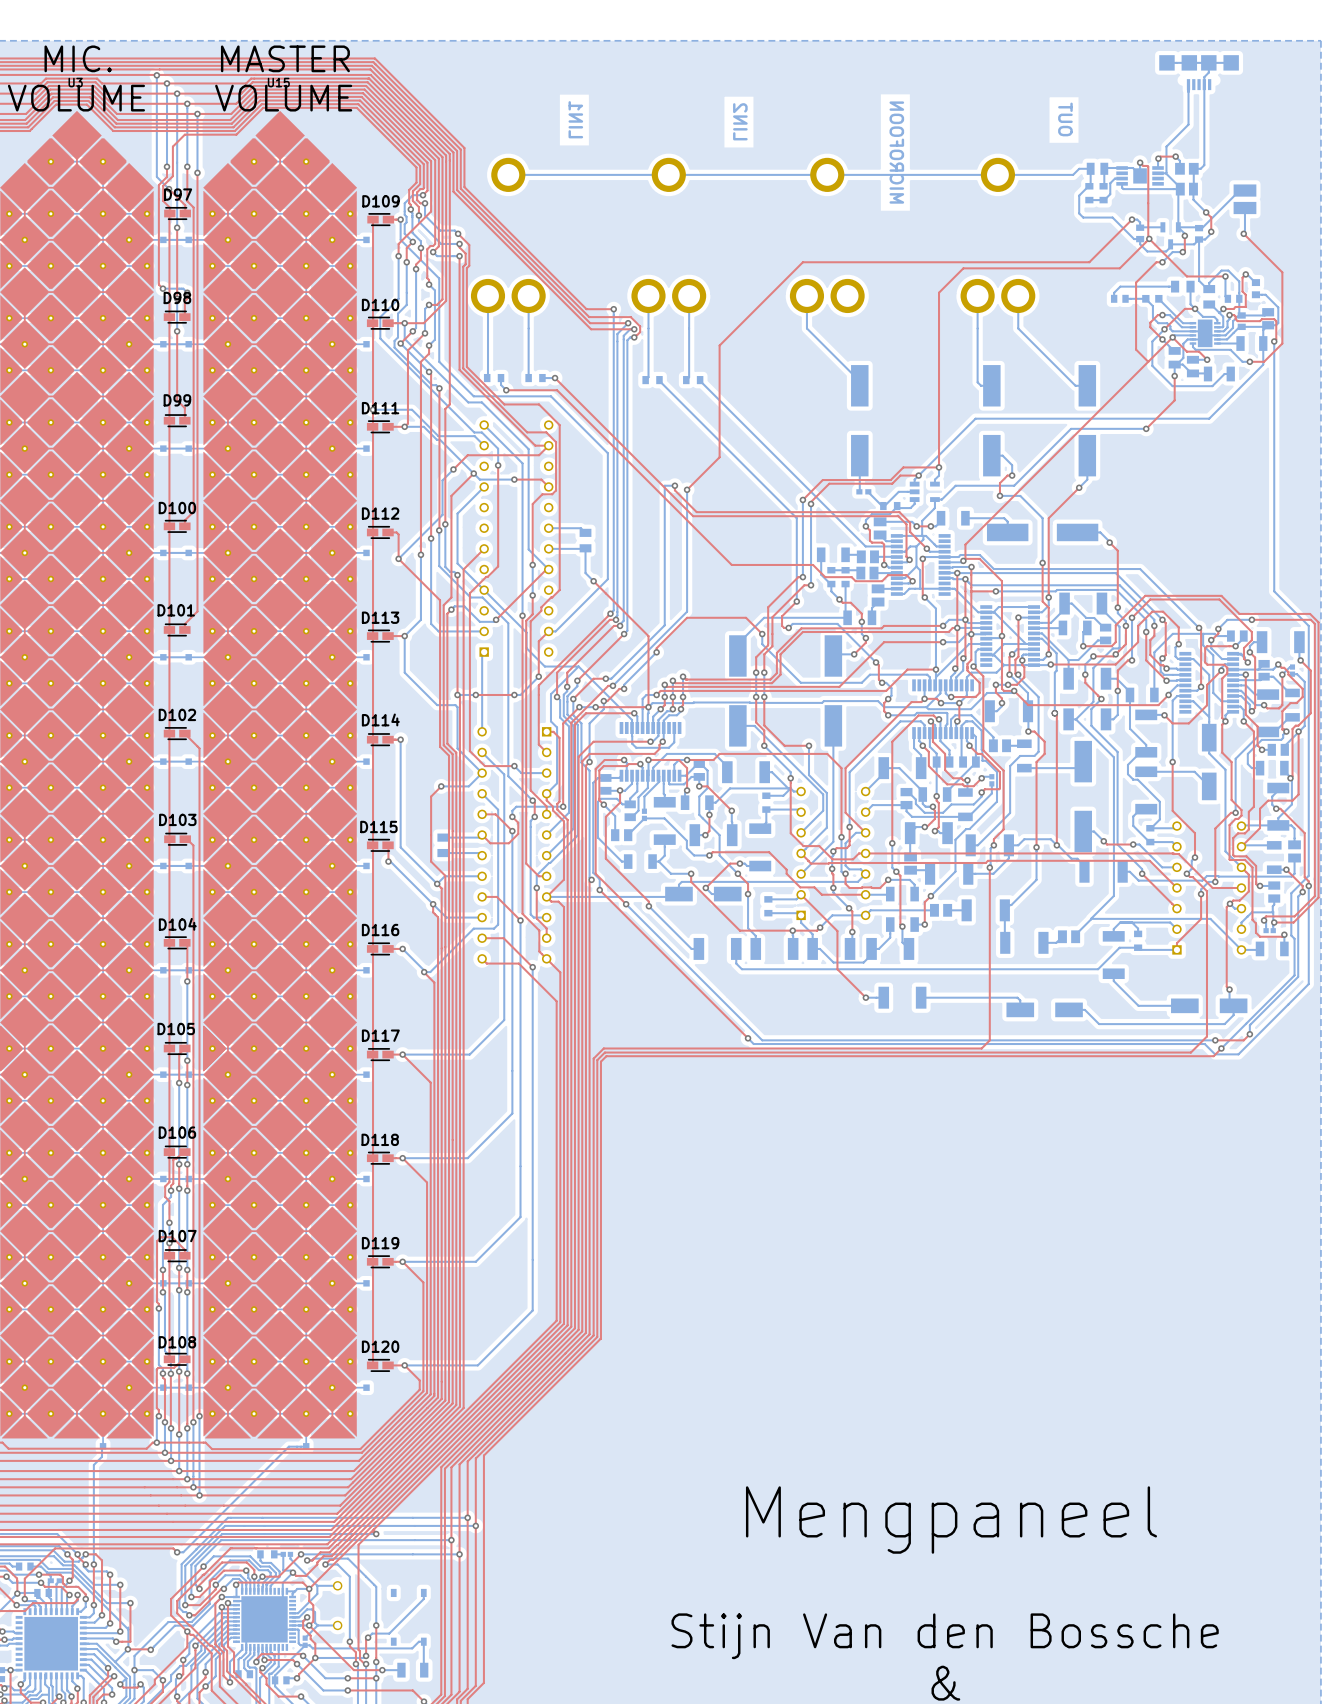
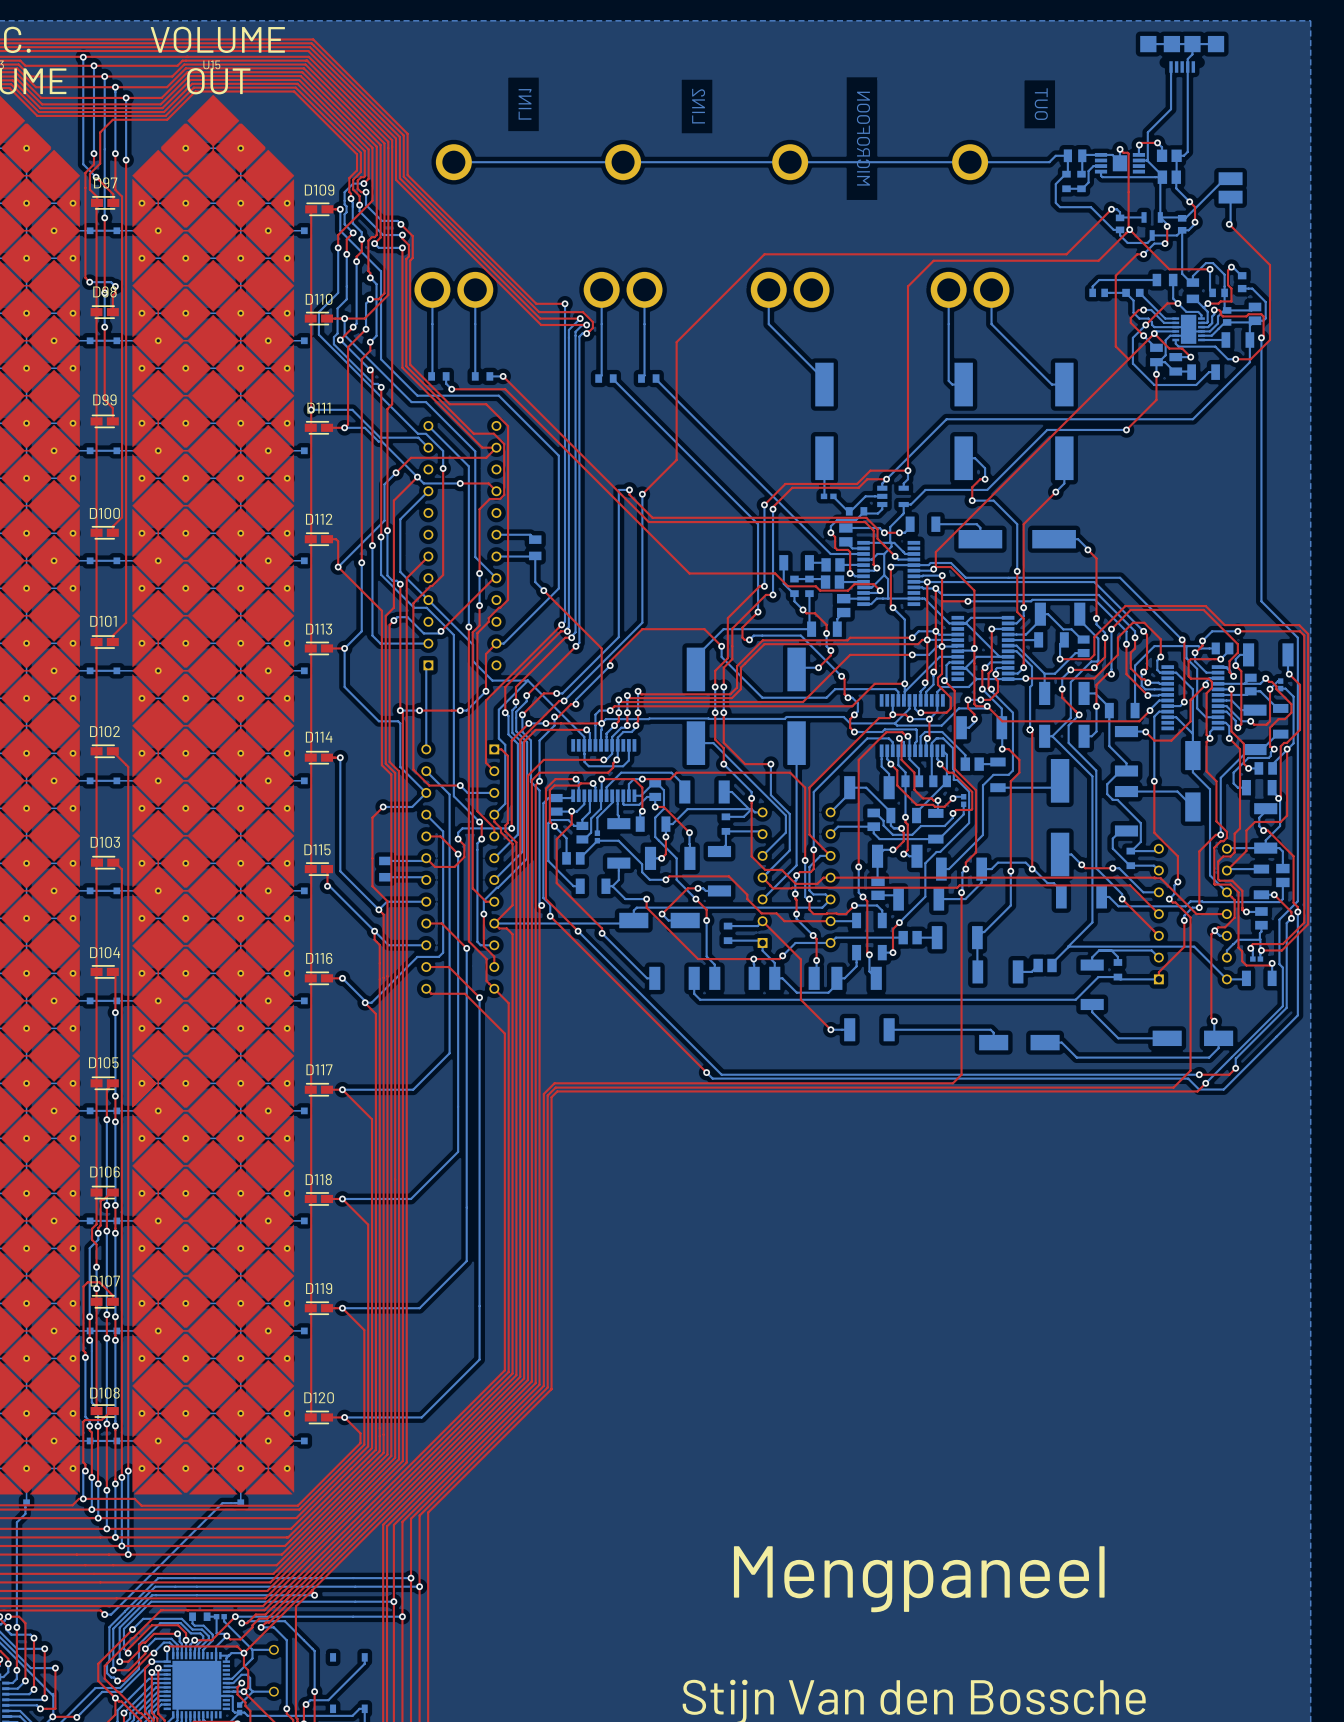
text: MASTER (285, 58) -> VOLUME (217, 39)
text: VOLUME (283, 98) -> OUT (218, 81)

